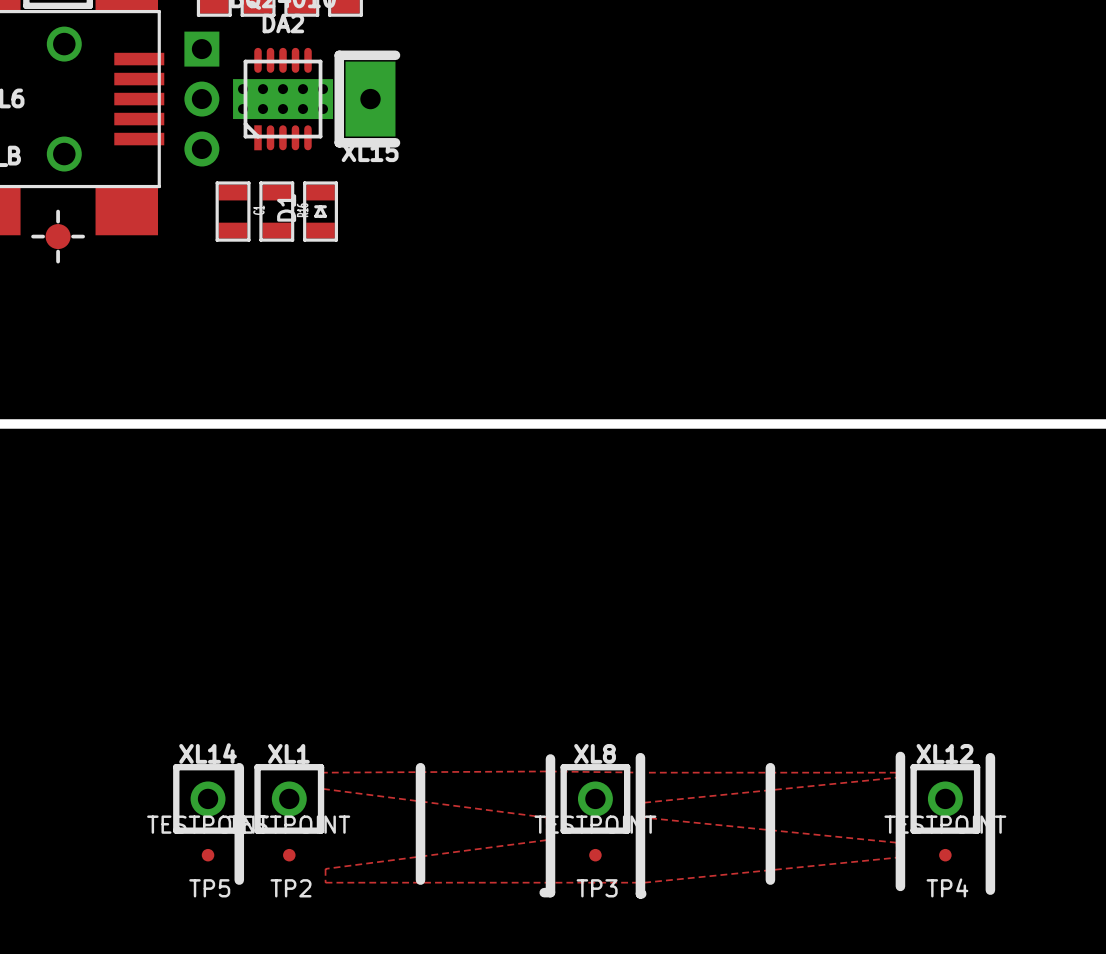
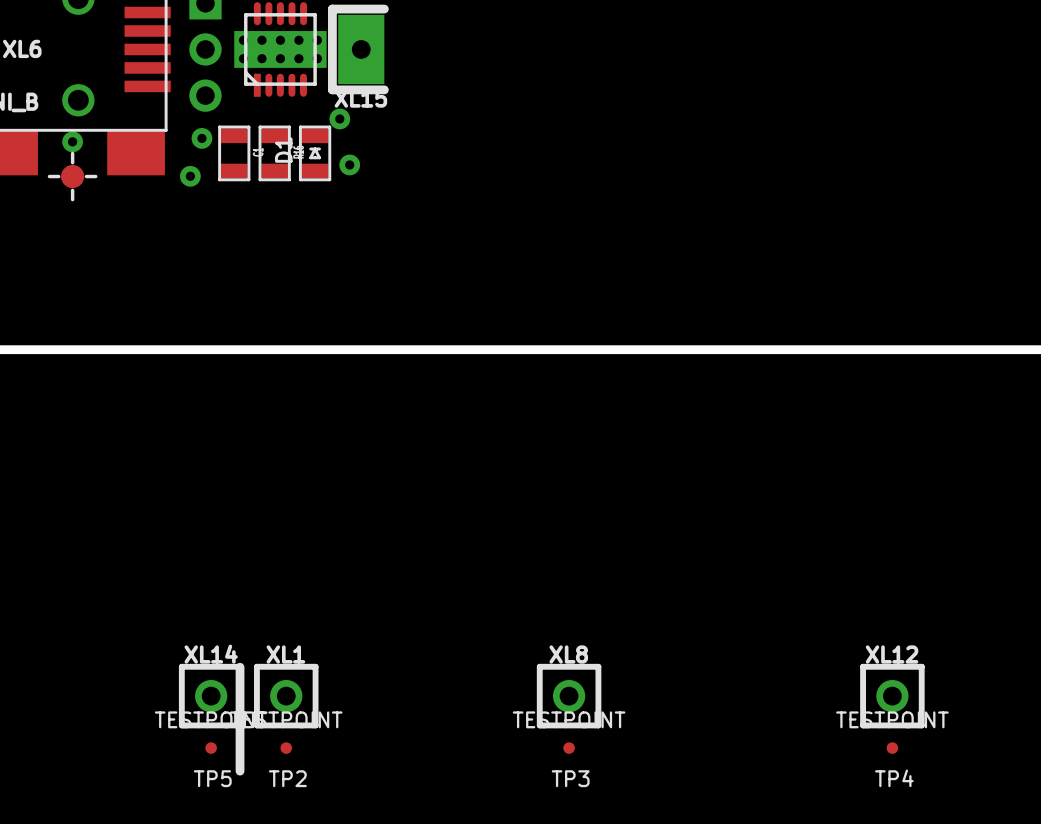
via: none -> (339, 118)
via: none -> (201, 138)
via: none -> (72, 141)
via: none -> (349, 164)
via: none -> (190, 176)
line: (900, 756) (900, 886) -> none
line: (640, 757) (641, 893) -> none
line: (990, 757) (990, 890) -> none
line: (550, 758) (550, 892) (544, 892) -> none
line: (420, 767) (420, 880) -> none
line: (770, 767) (770, 880) -> none
top zone outline: (546, 771) (896, 772) (896, 777) (644, 802) (644, 817) (896, 842) (896, 857) (644, 882) (325, 882) (325, 868) (546, 840) (546, 817) (323, 788) (323, 772) (546, 771) -> none

